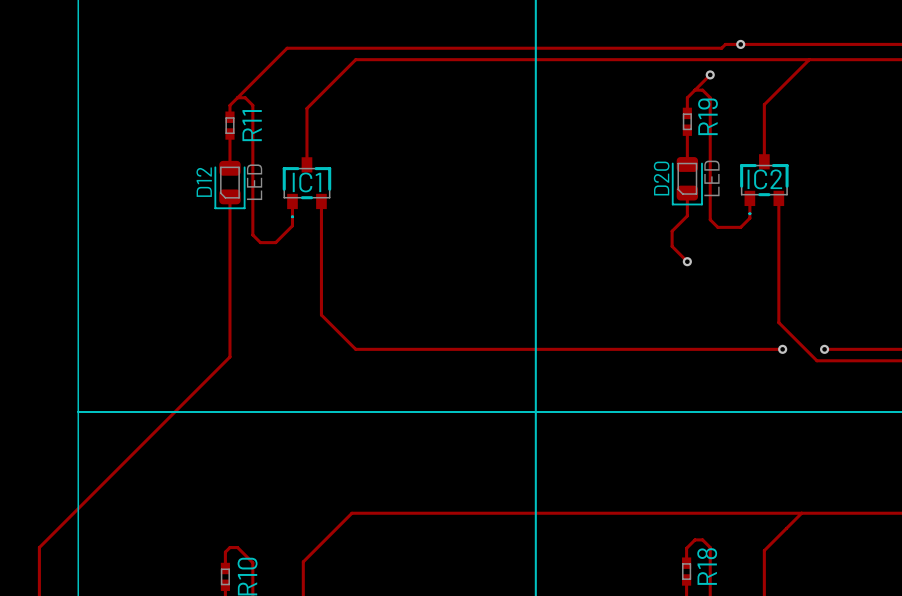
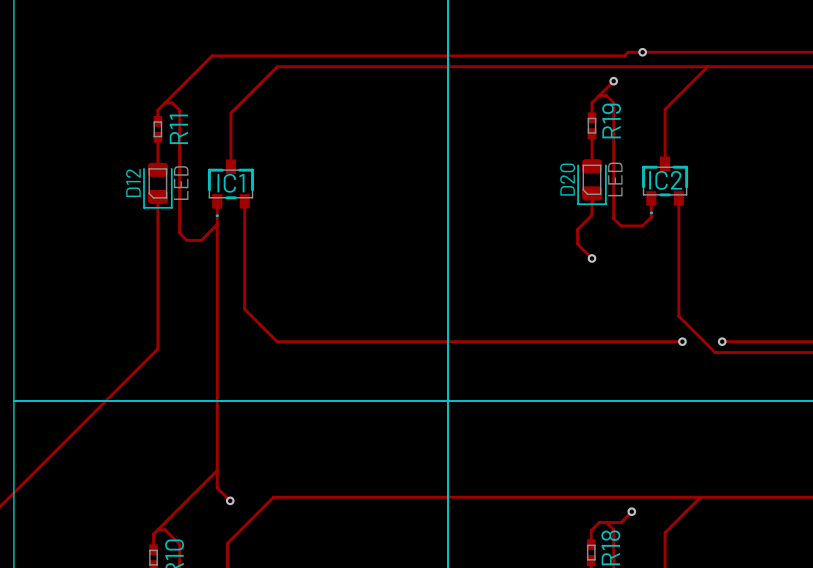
track: none -> (217, 224) (217, 487) (230, 500)
track: none -> (217, 470) (157, 529)
via: none -> (230, 500)
track: none -> (631, 511) (620, 522) (606, 522)
via: none -> (631, 511)

